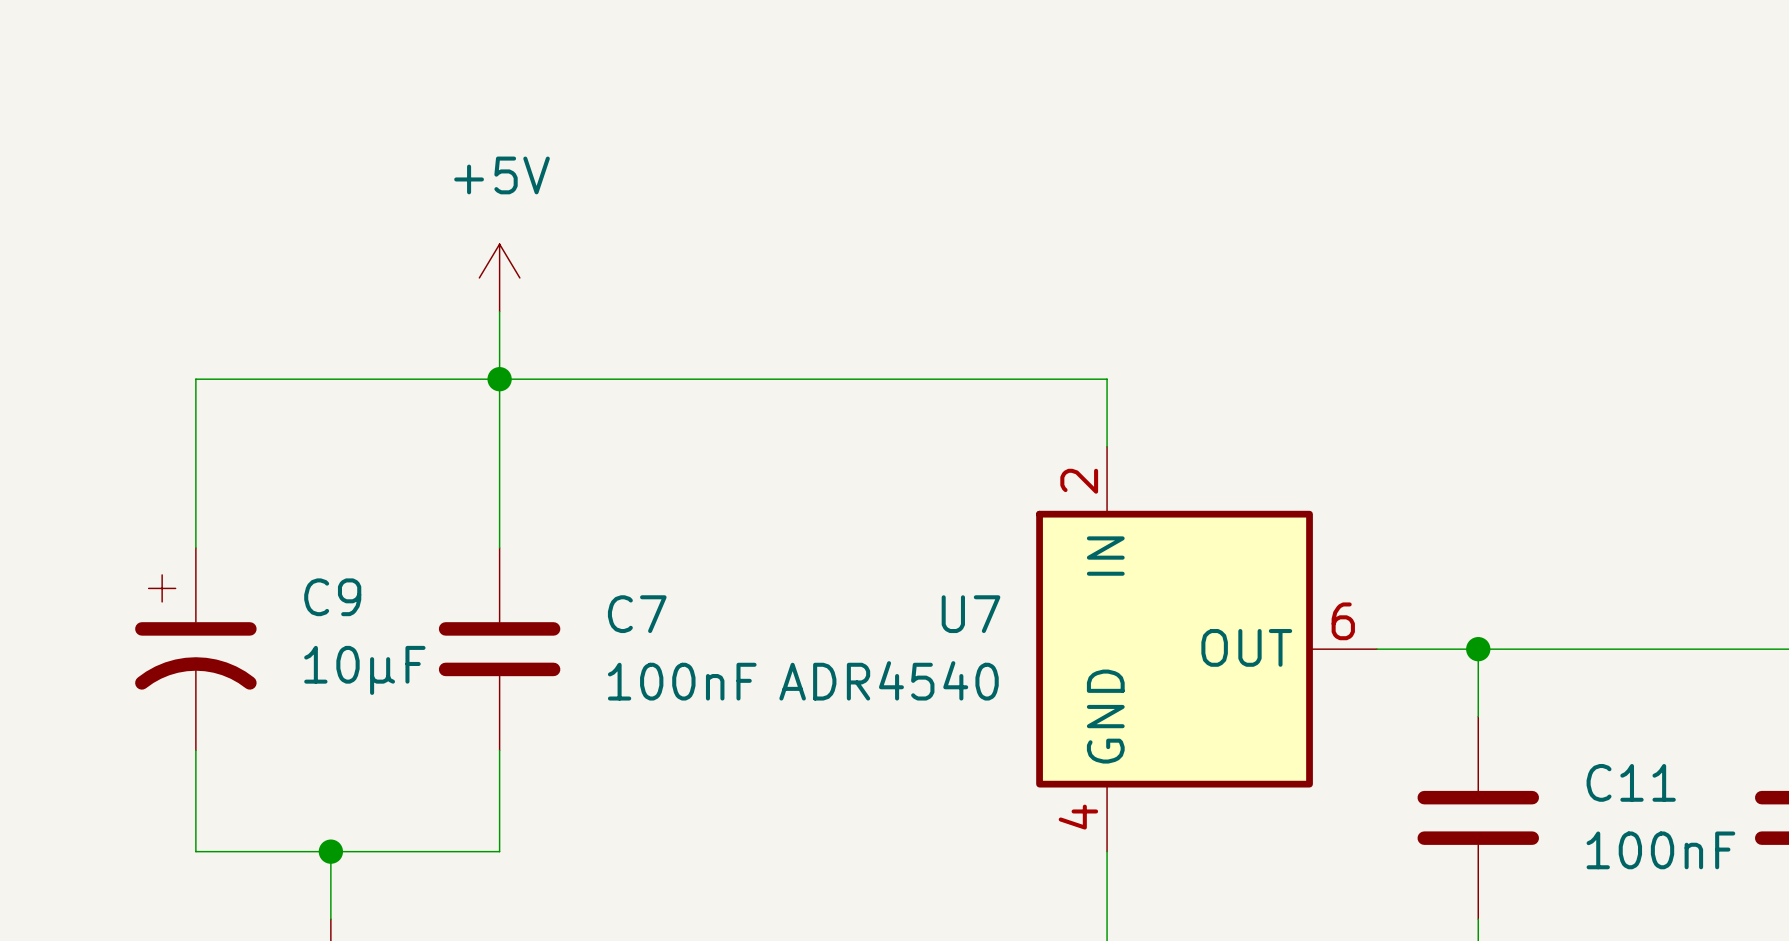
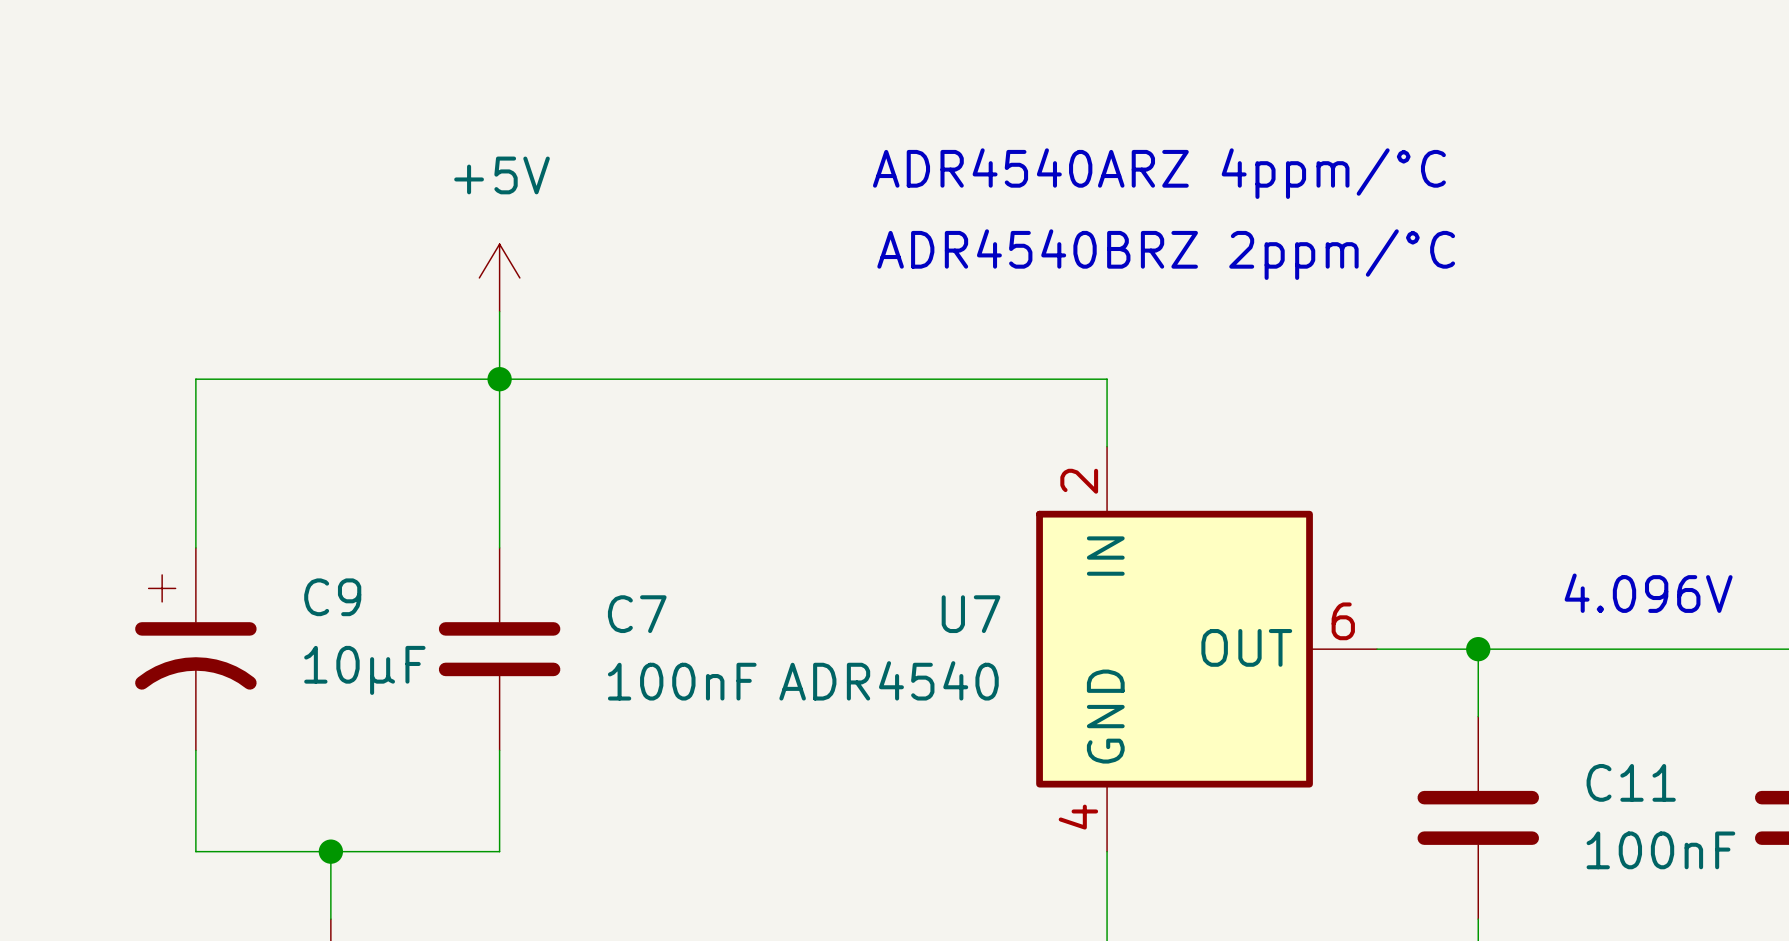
text: none -> ADR4540ARZ 4ppm/°C (1159, 173)
text: none -> ADR4540BRZ 2ppm/°C (1166, 254)
text: none -> 4.096V (1648, 593)

